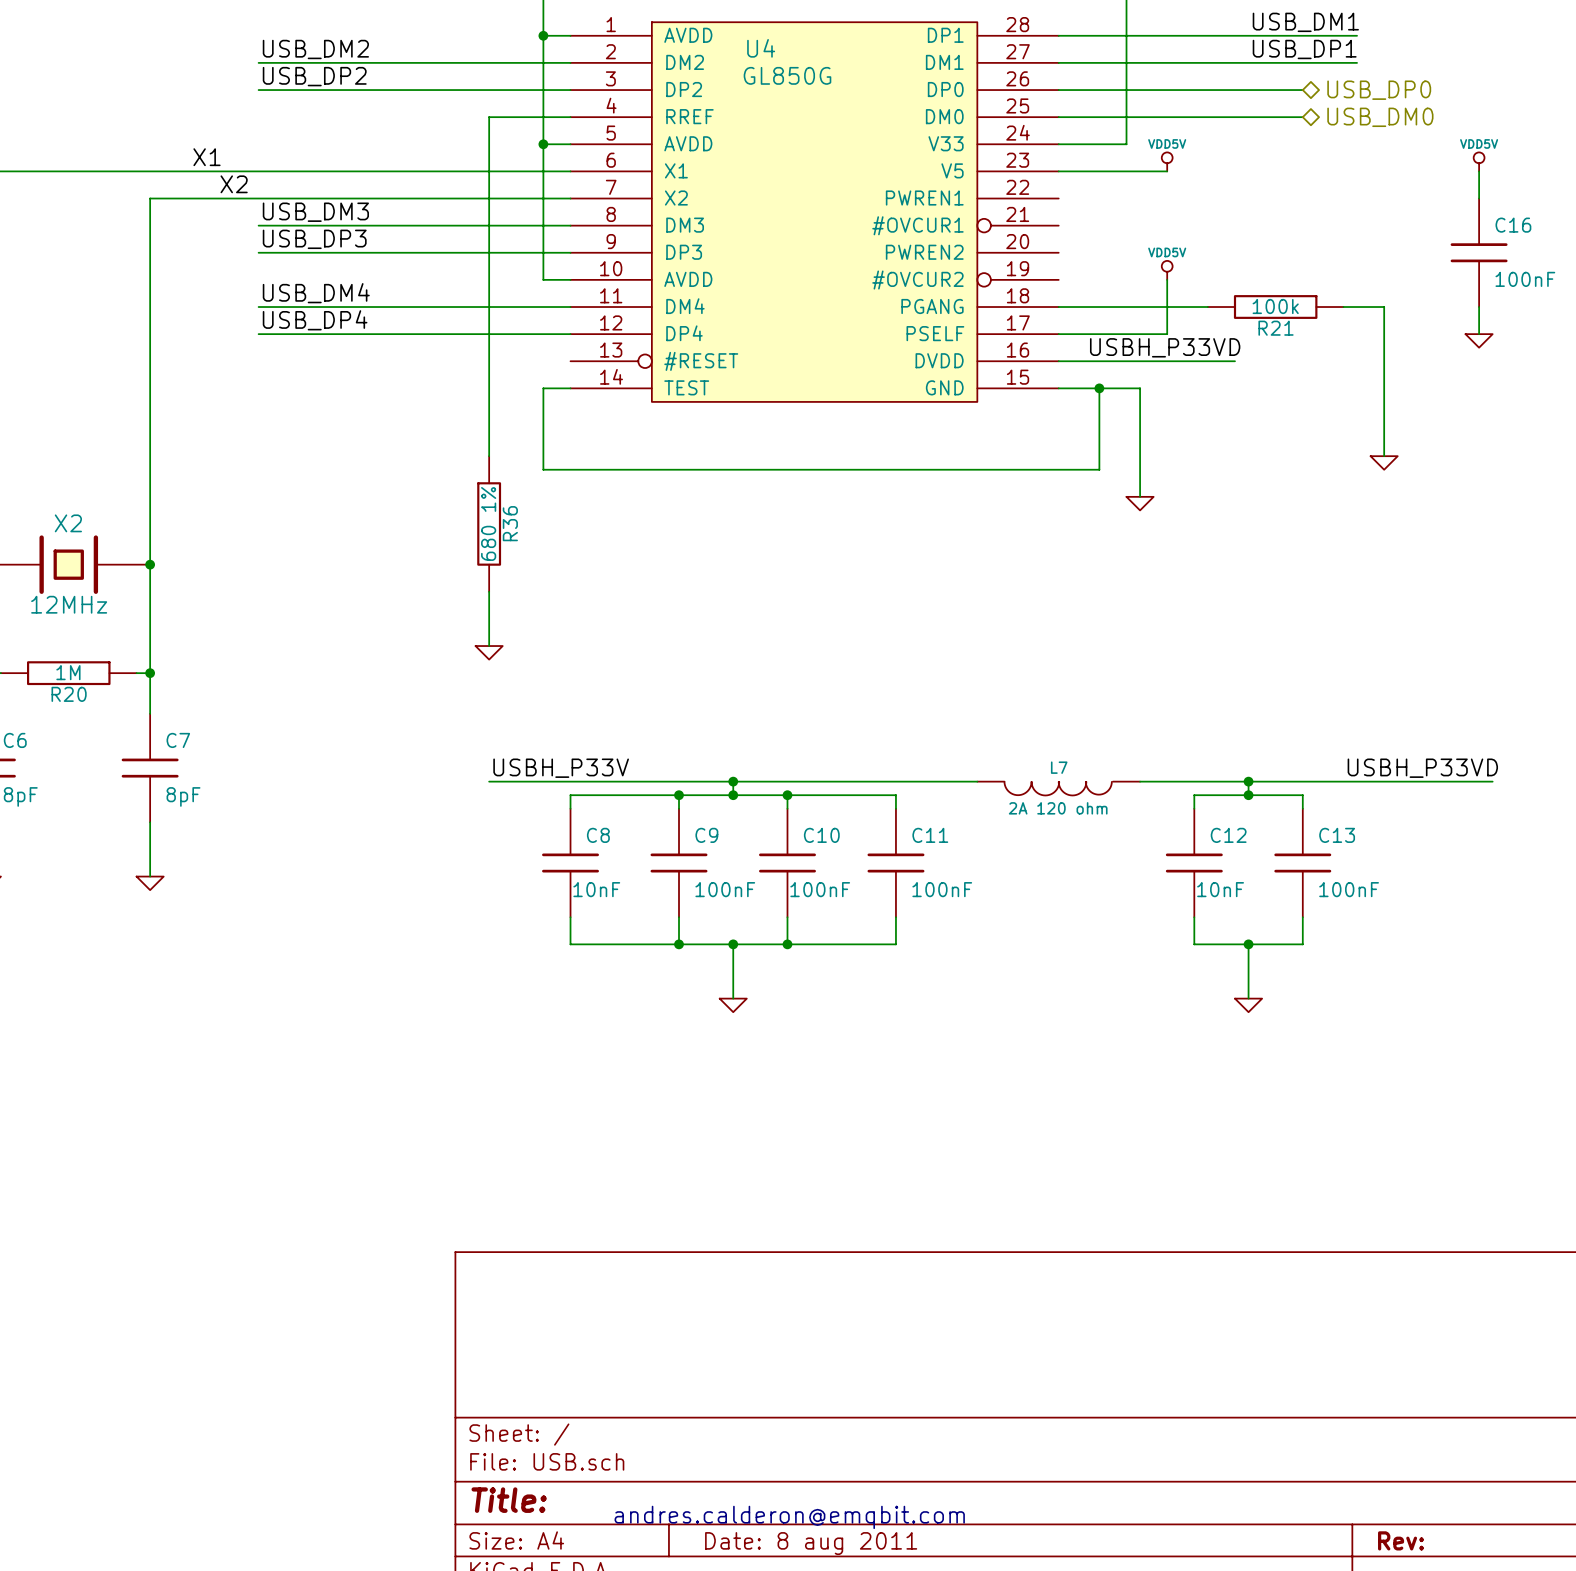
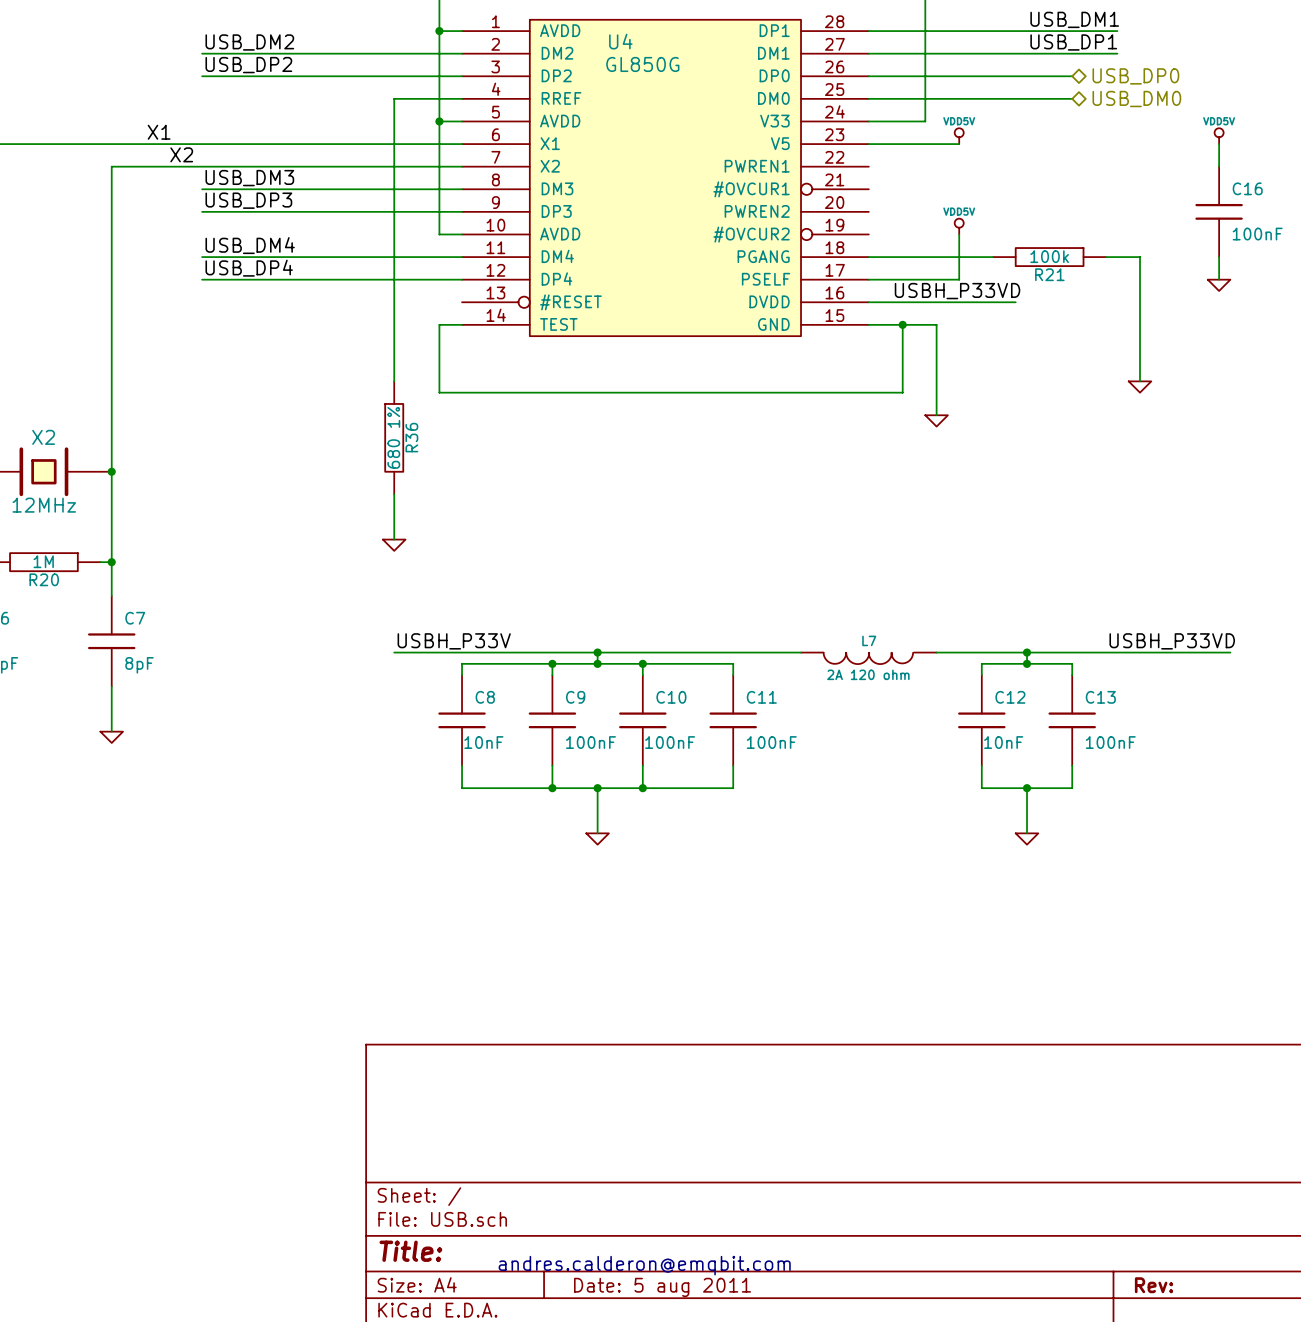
title block: Date: 8 aug 2011 (811, 1543) -> Date: 5 aug 2011 (662, 1287)

